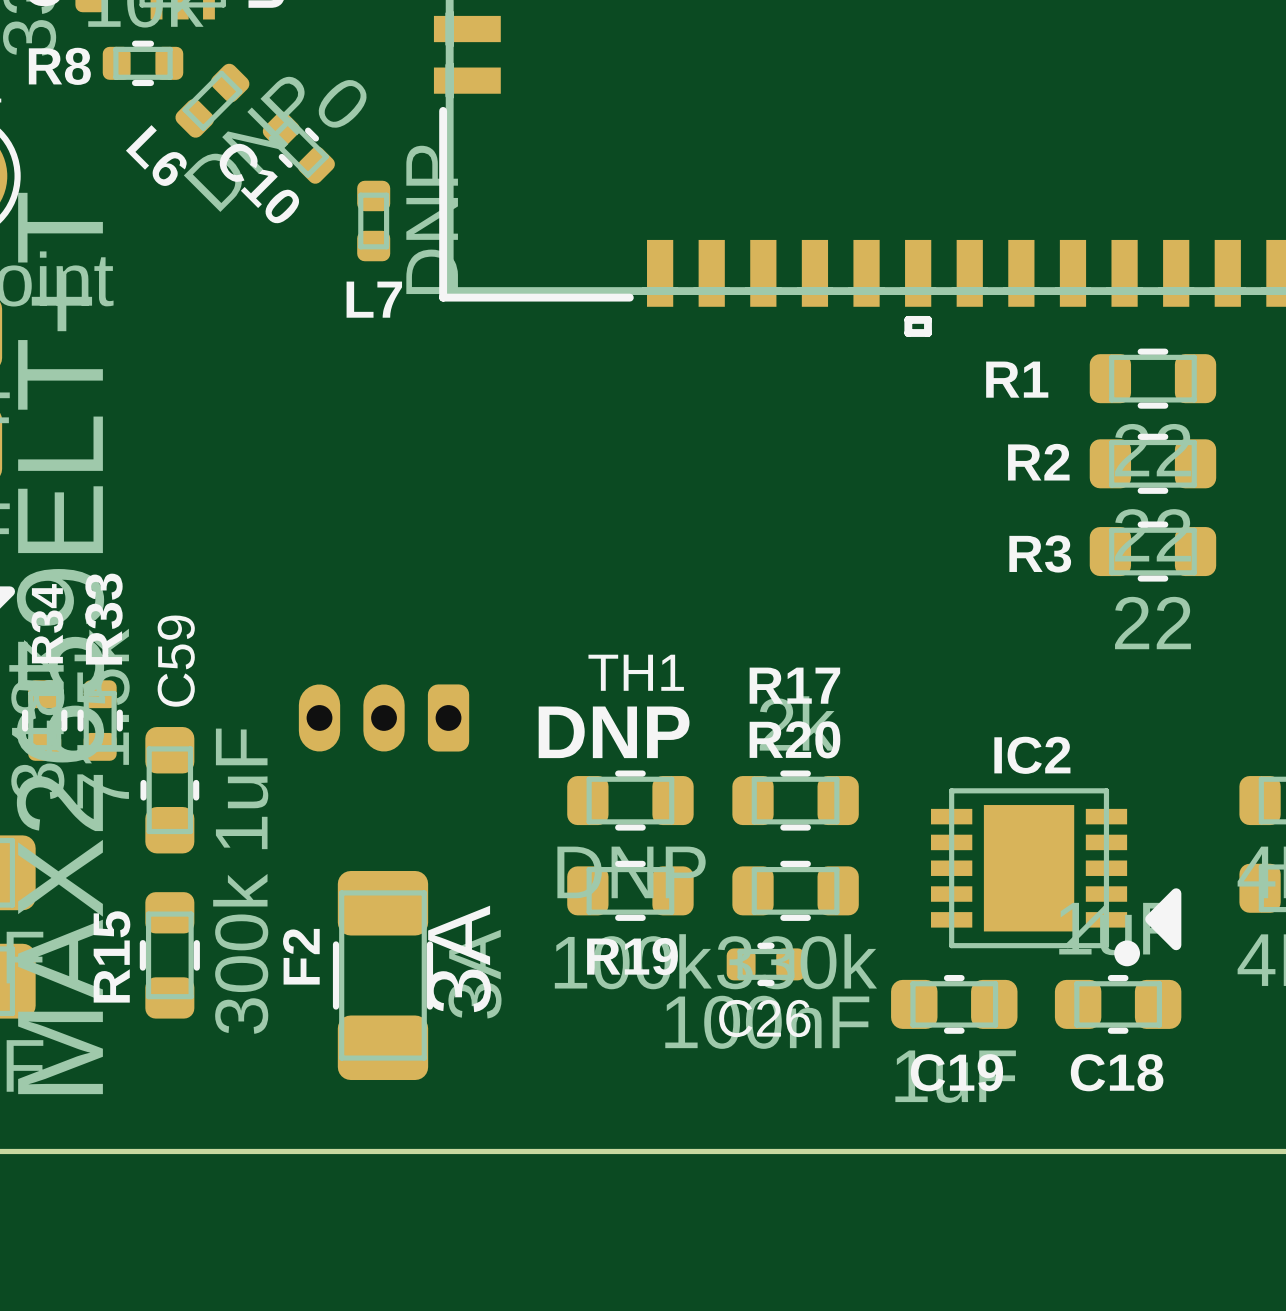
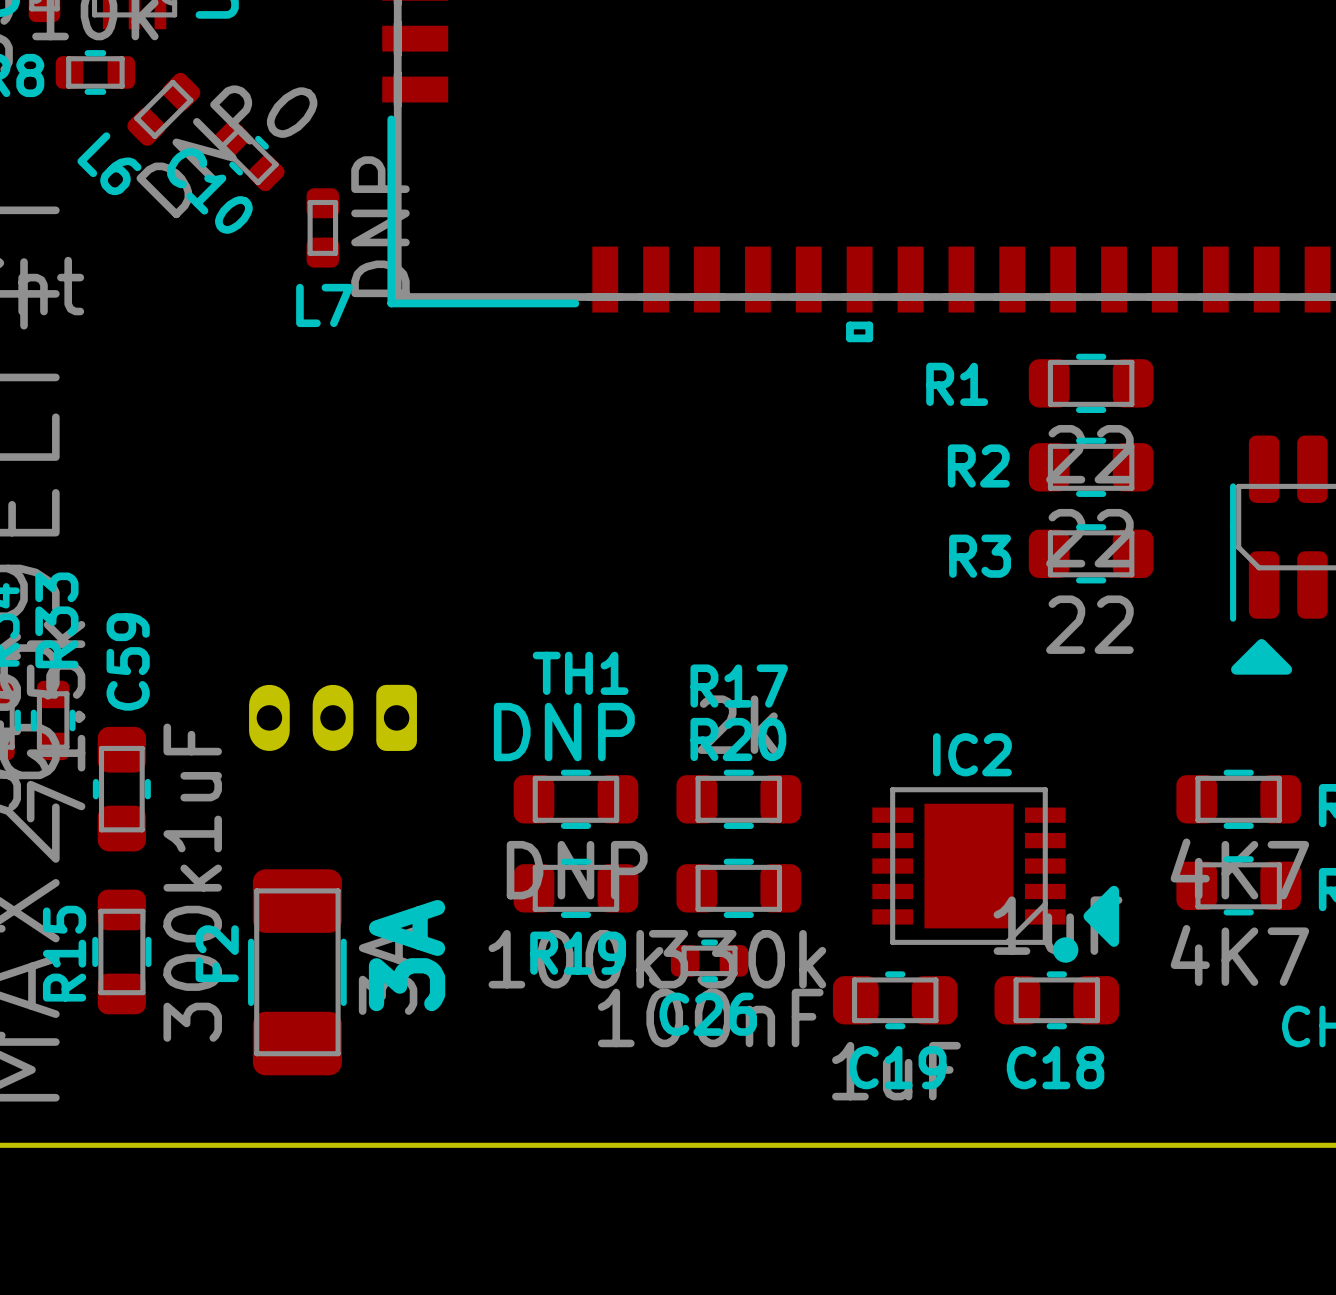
F2 position: (382, 975) -> (297, 972)

